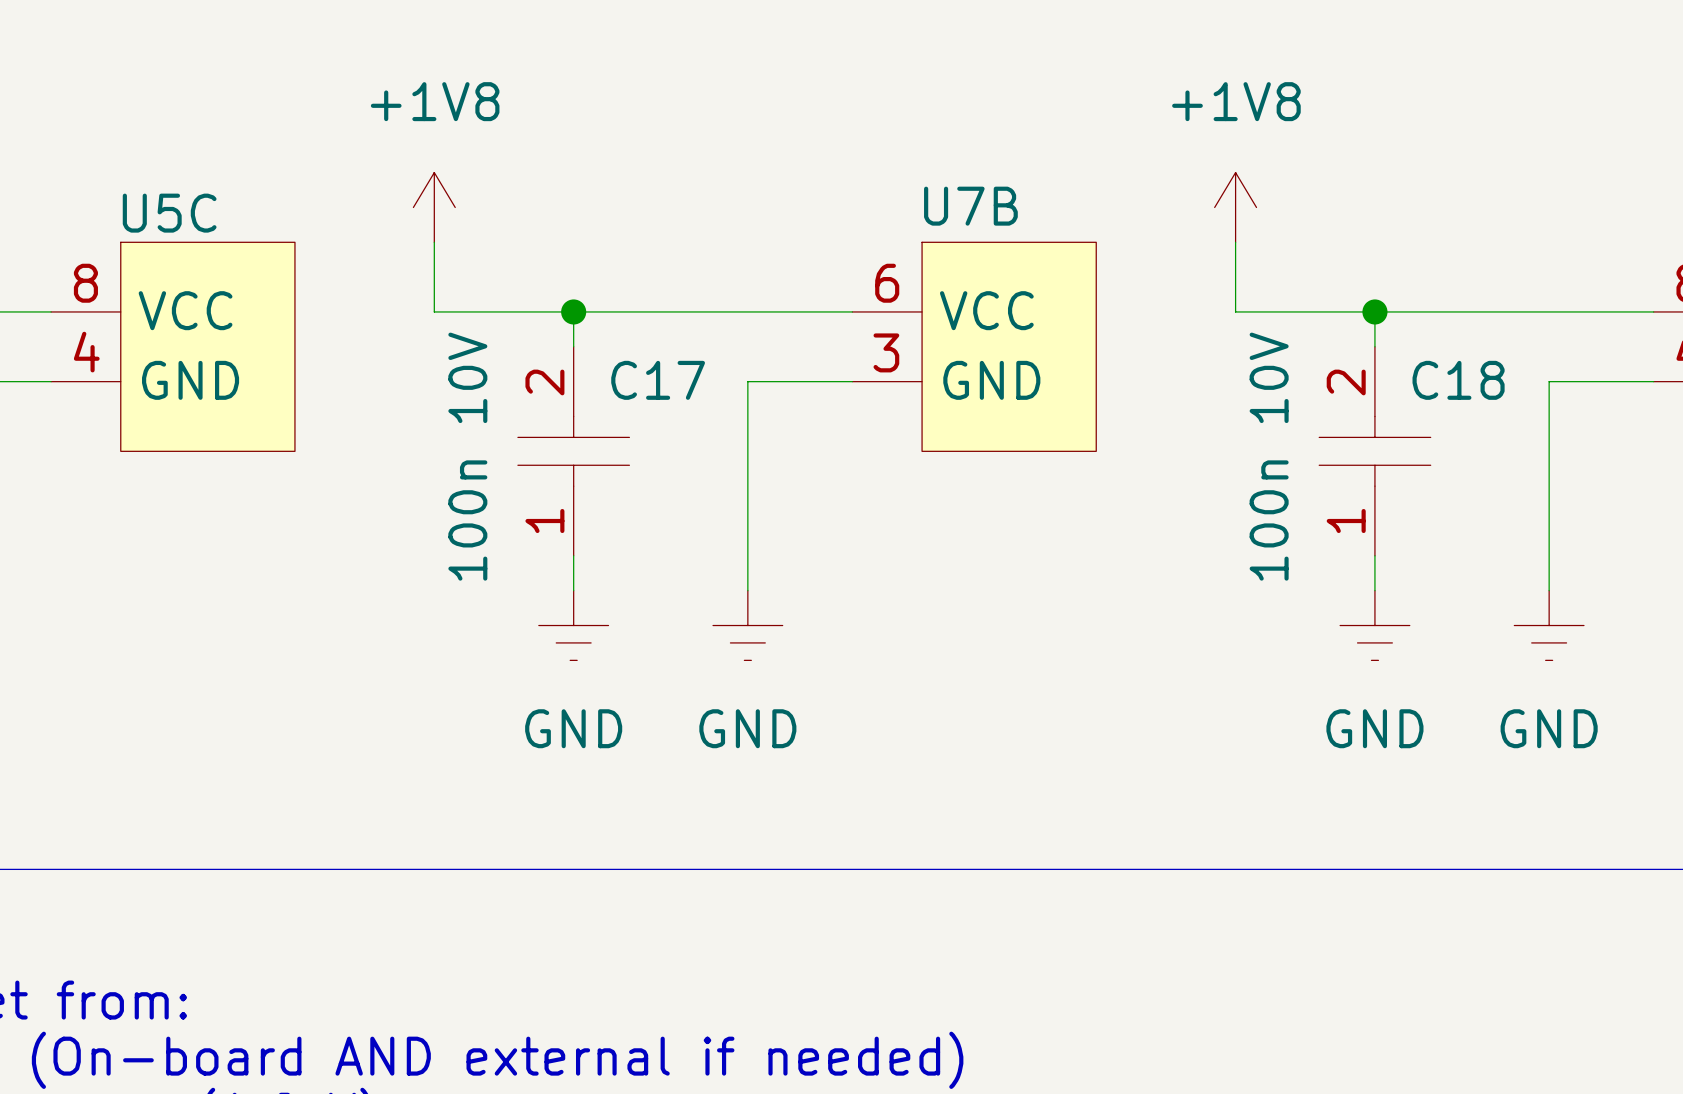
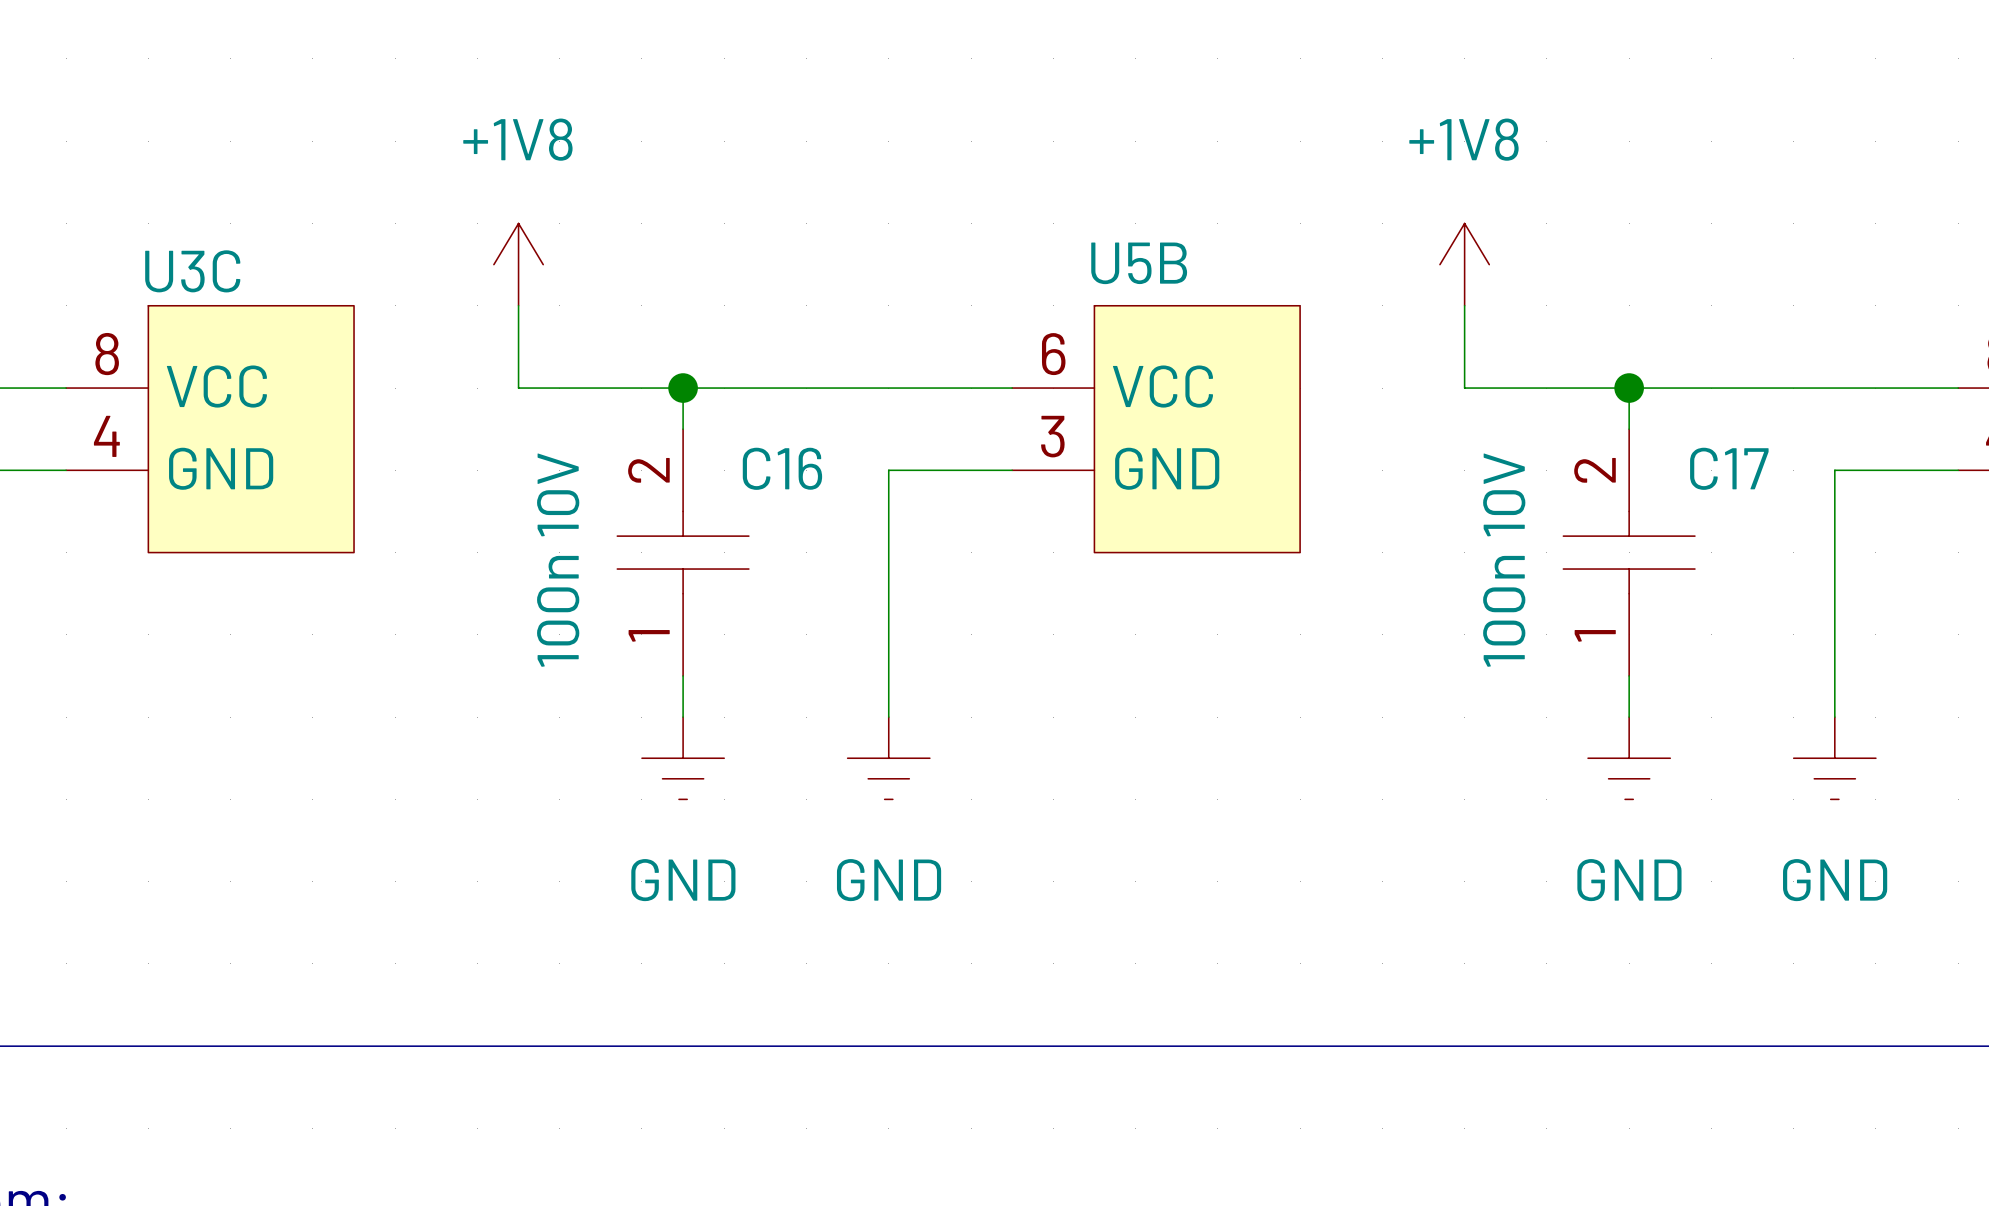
U7B name: U7B (970, 206) -> U5B (1139, 263)
U5C name: U5C (169, 213) -> U3C (192, 271)
C17 name: C17 (658, 380) -> C16 (782, 468)
C18 name: C18 (1458, 380) -> C17 (1729, 468)

